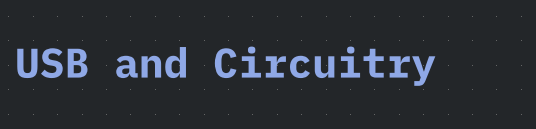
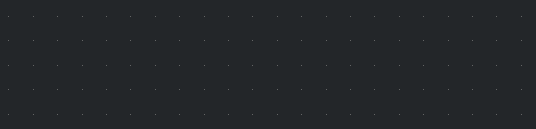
text: USB and Circuitry (226, 66) -> none

